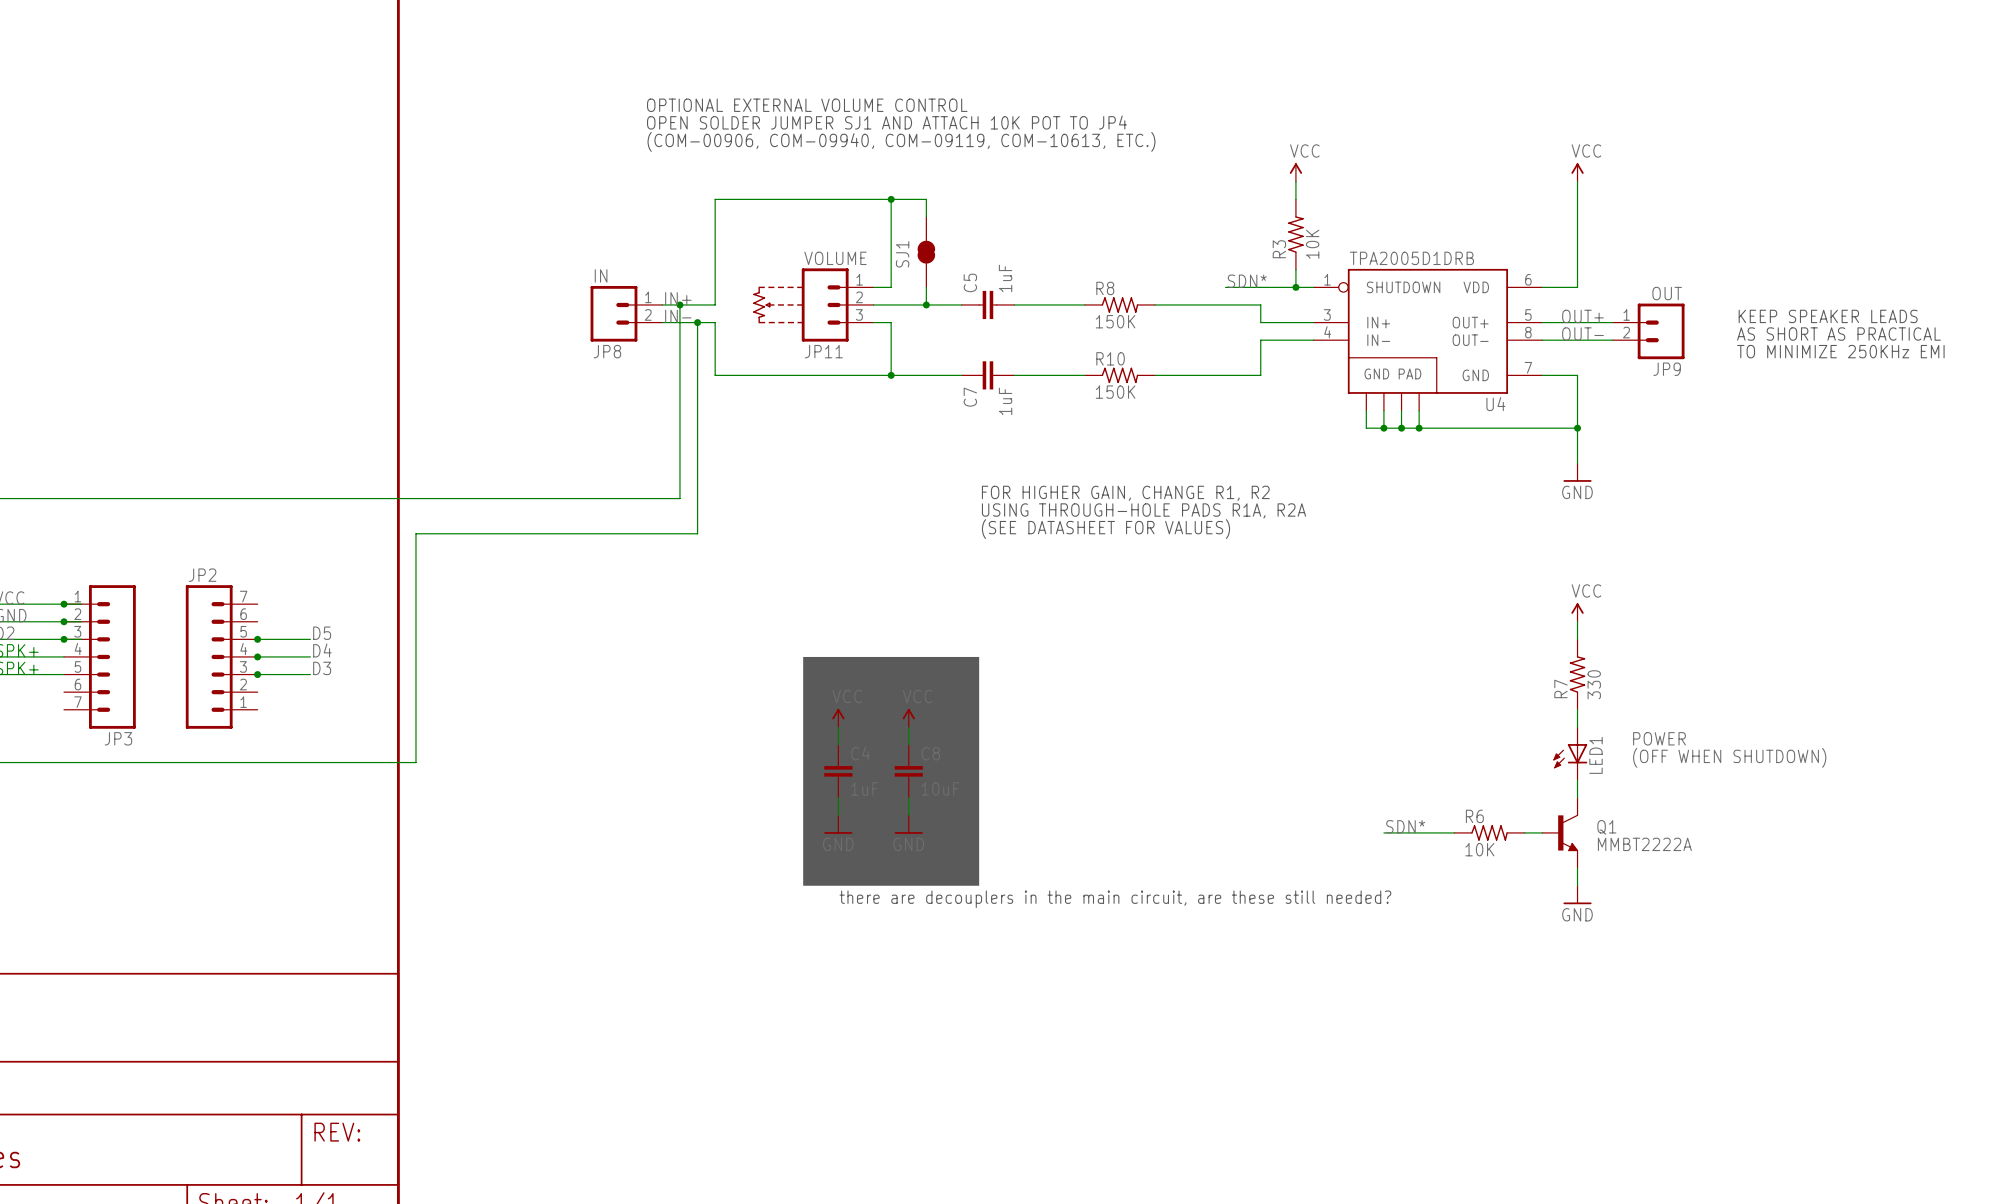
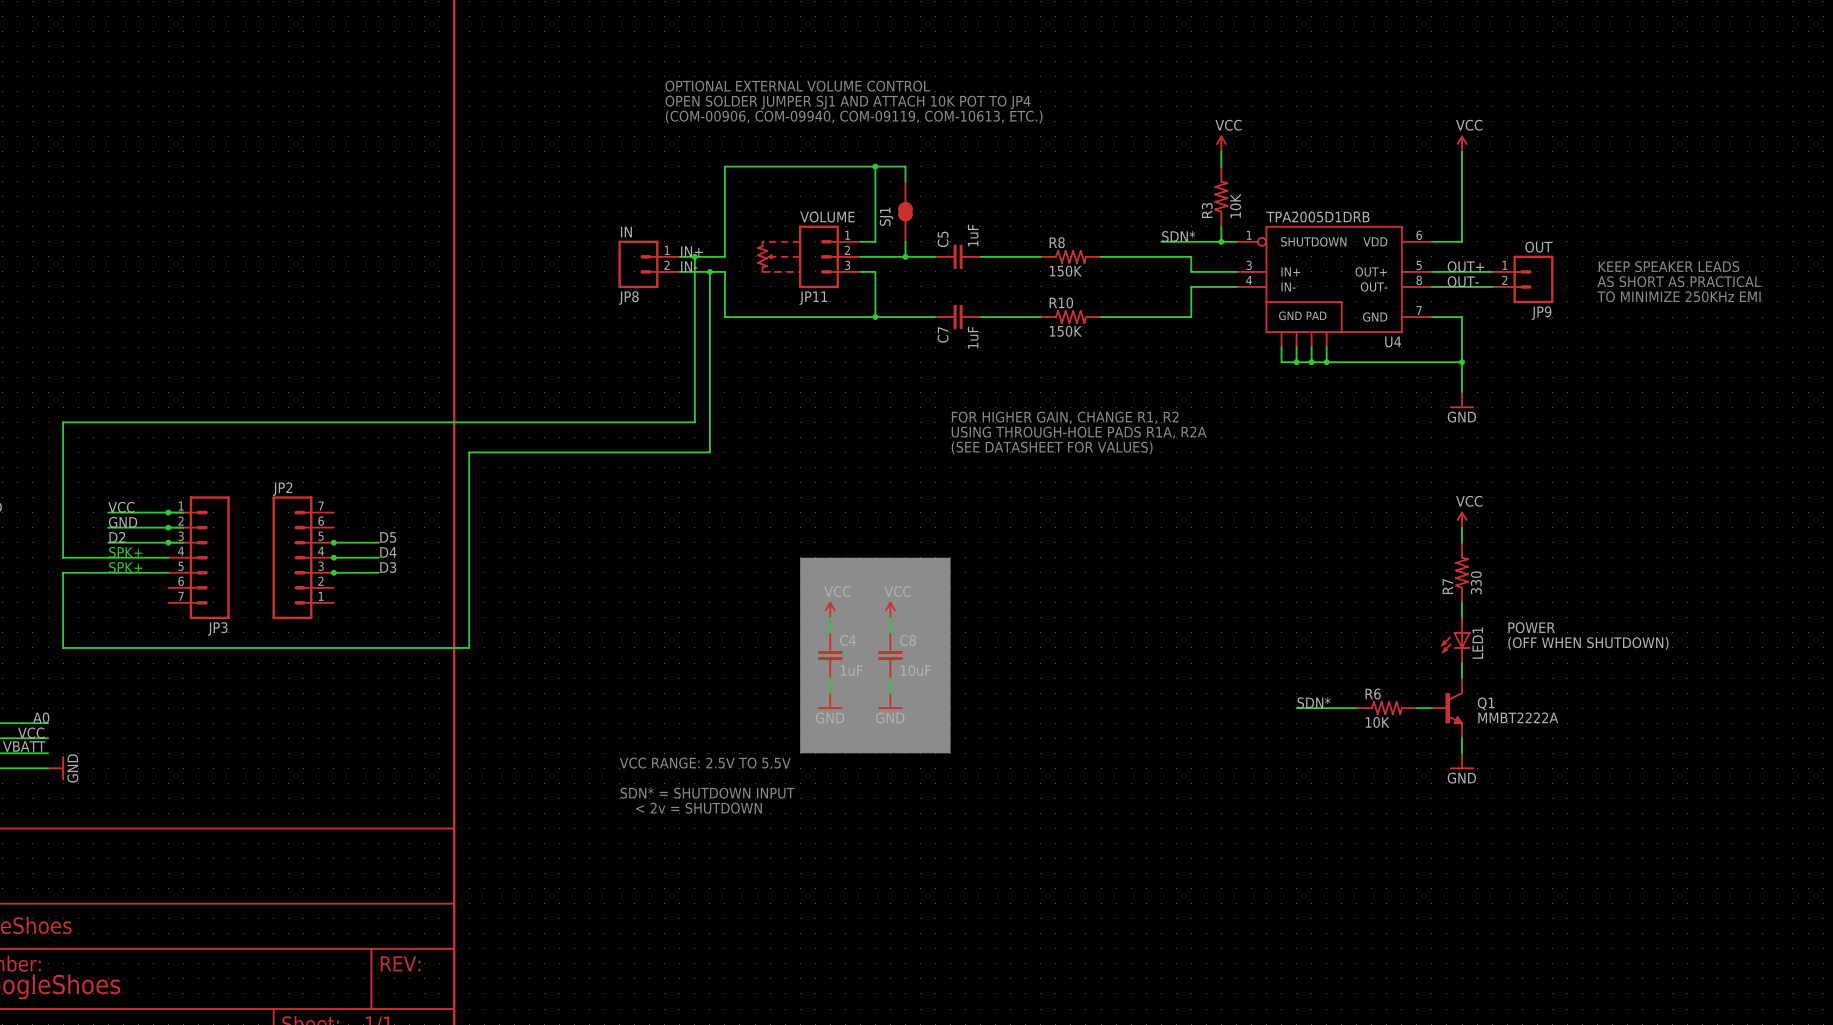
text: none -> VCC RANGE: 2.5V TO 5.5V (705, 763)
text: there are decouplers in the main circuit, are these still needed? (1115, 899) -> none
text: none -> SDN* = SHUTDOWN INPUT (707, 793)
text: none -> < 2v = SHUTDOWN (698, 808)

